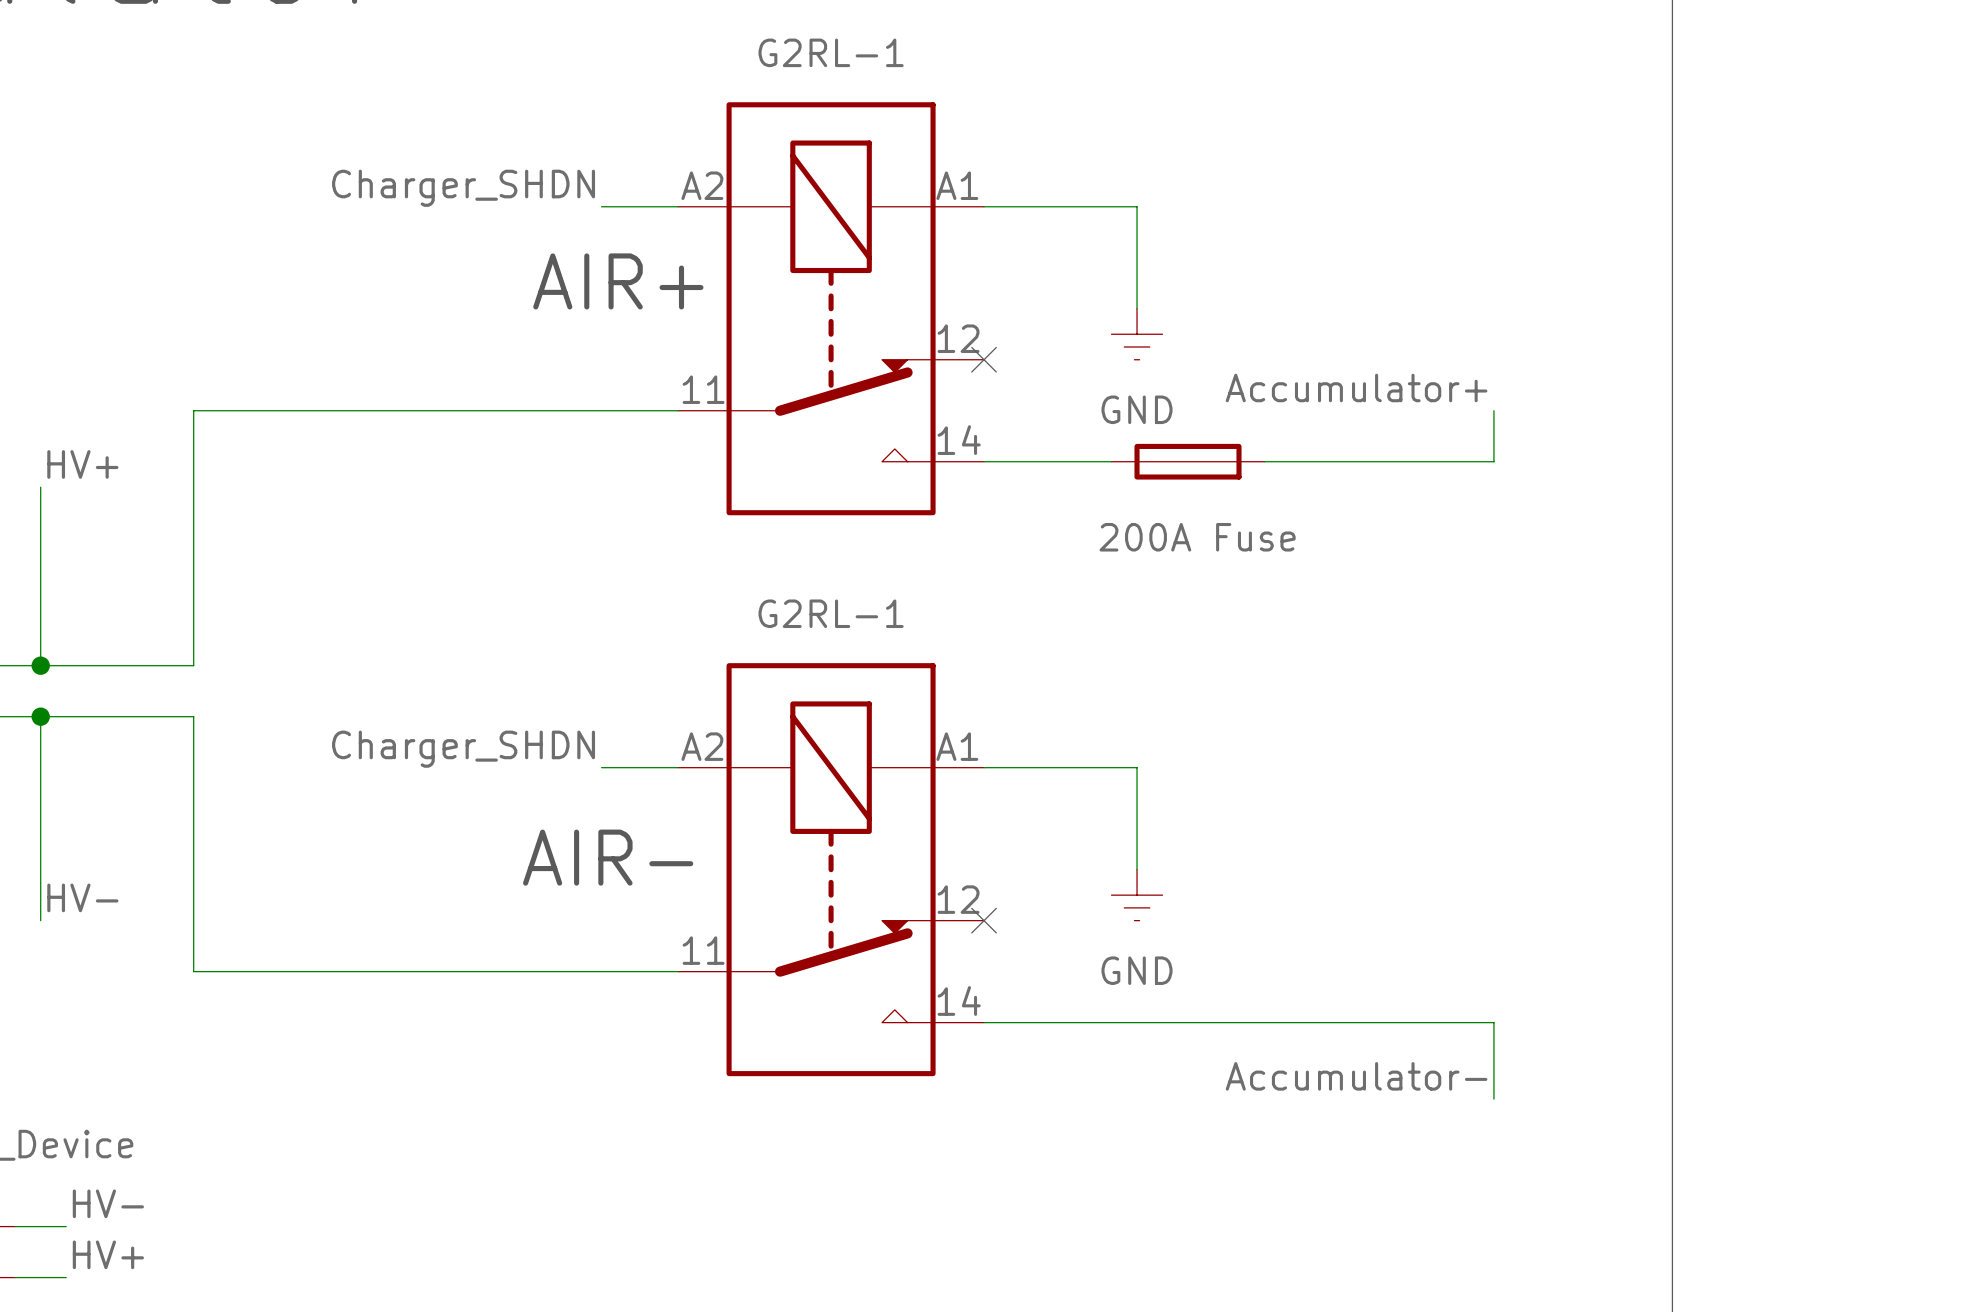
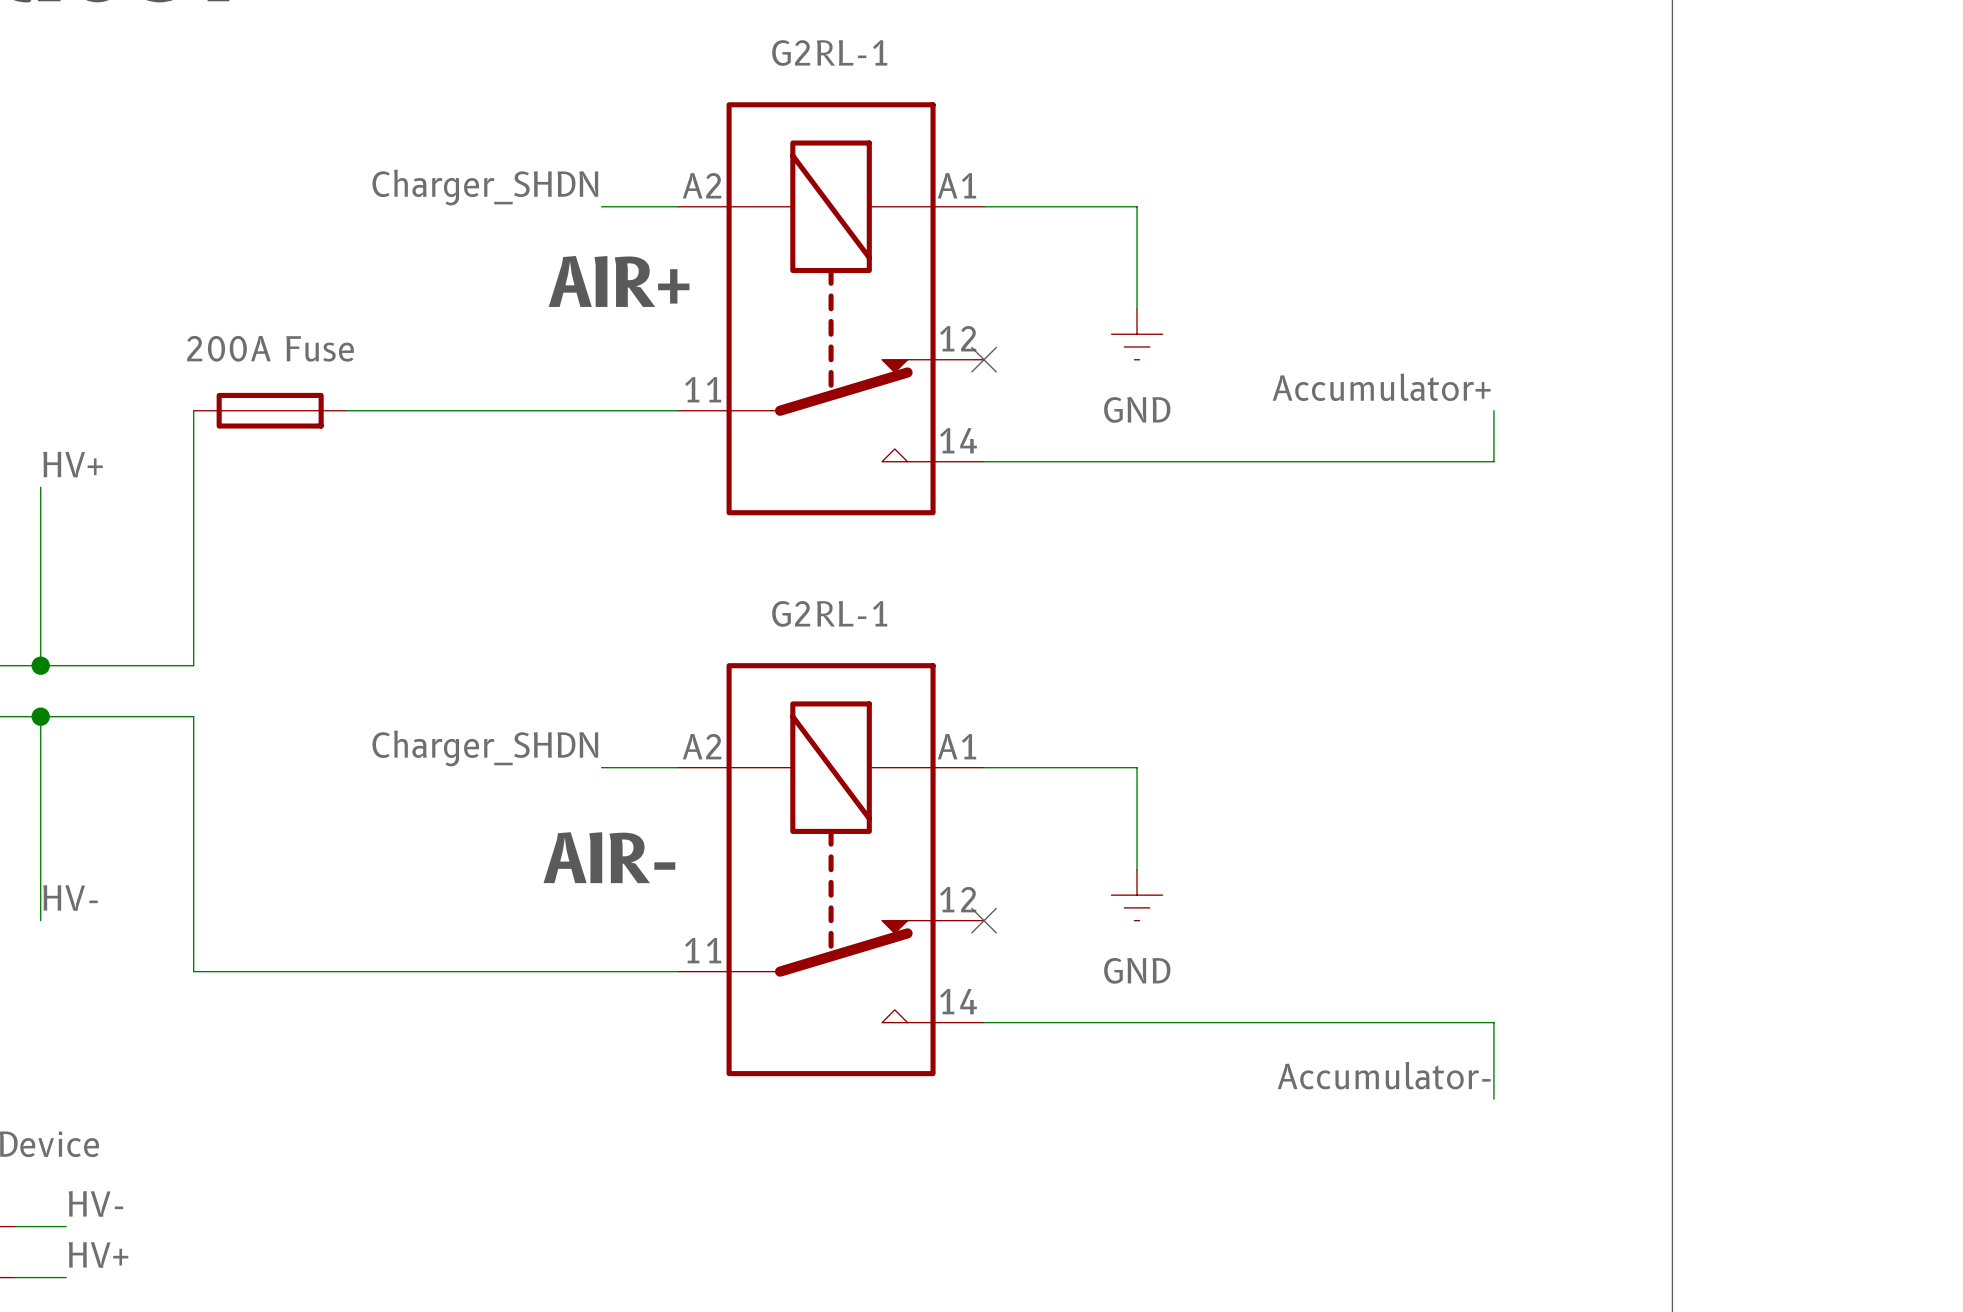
part: none -> 200A Fuse (270, 410)
part: 200A Fuse (1188, 461) -> none

